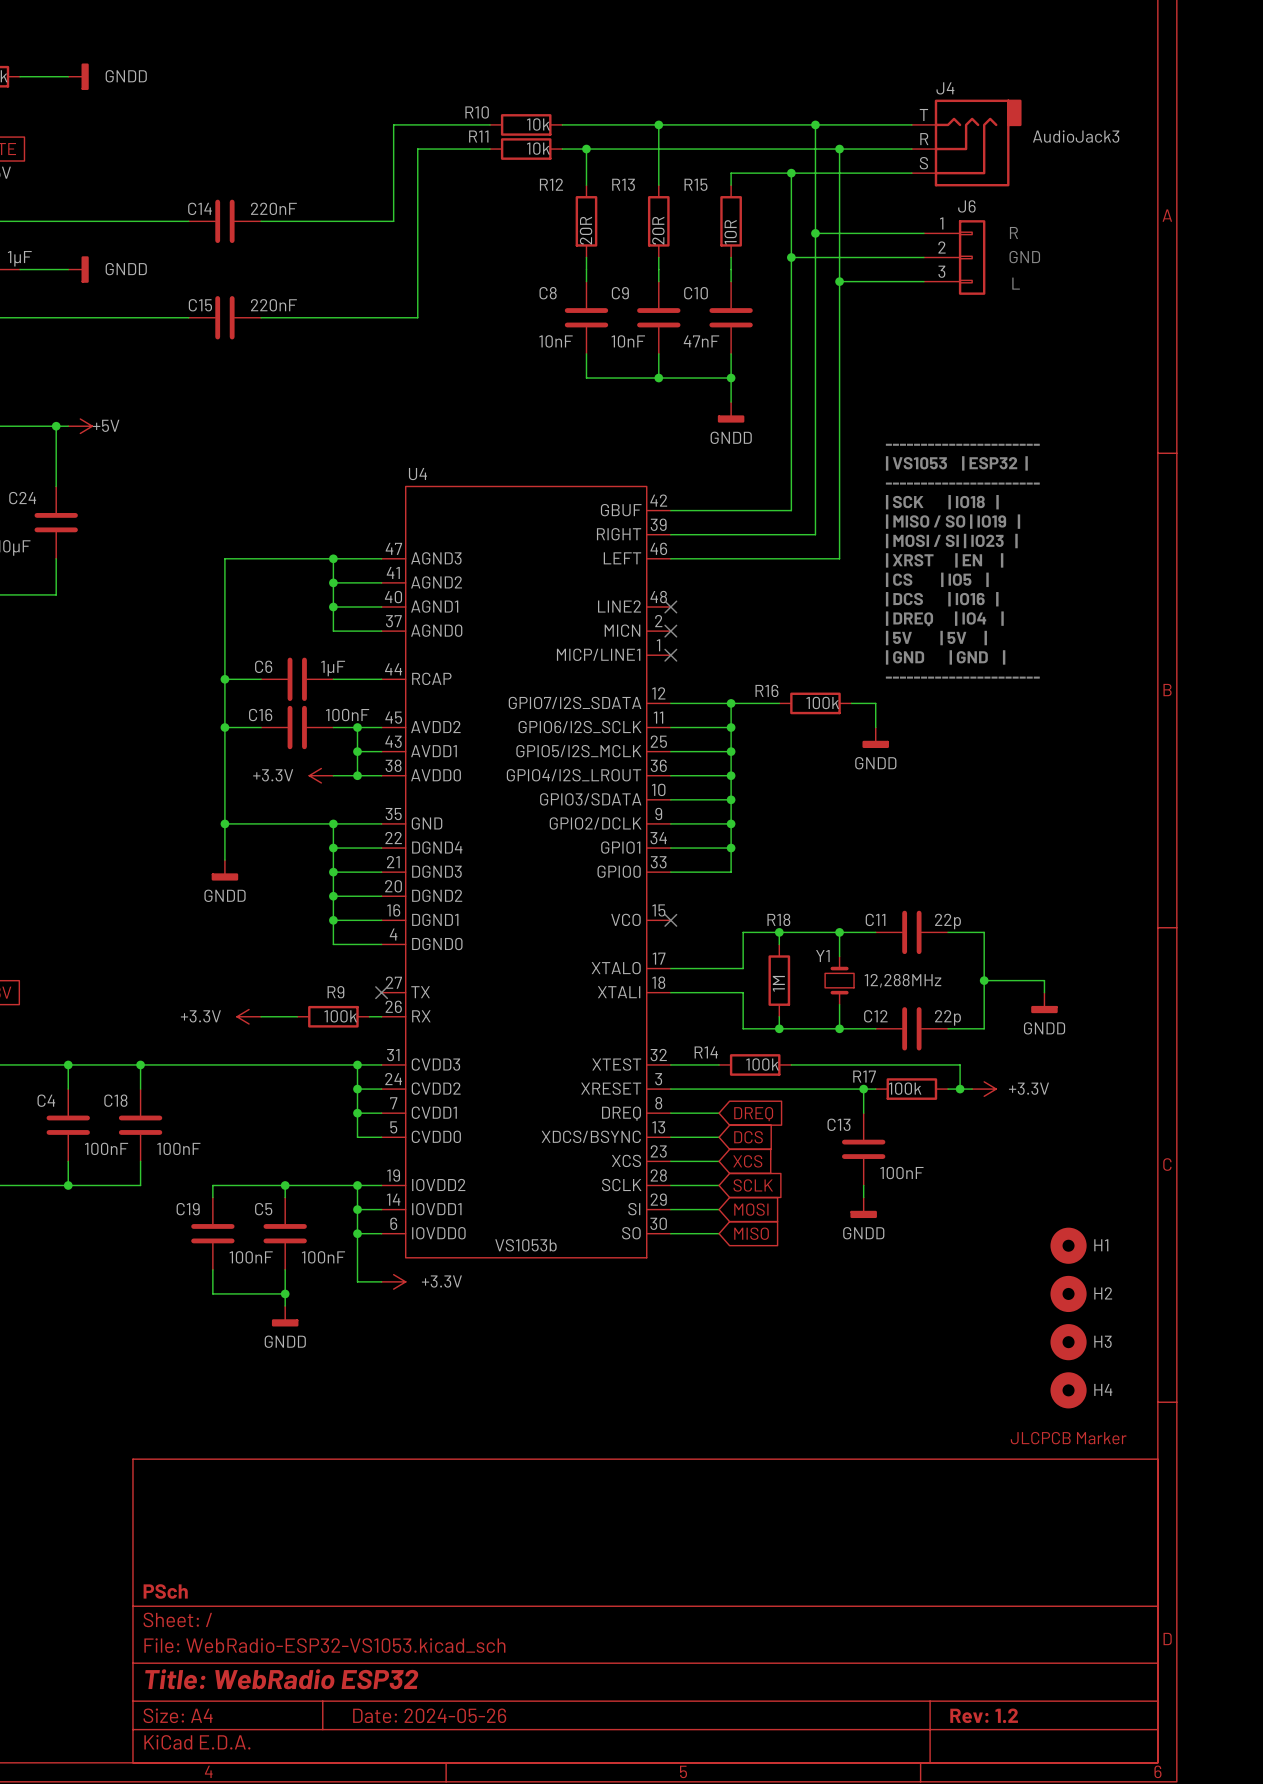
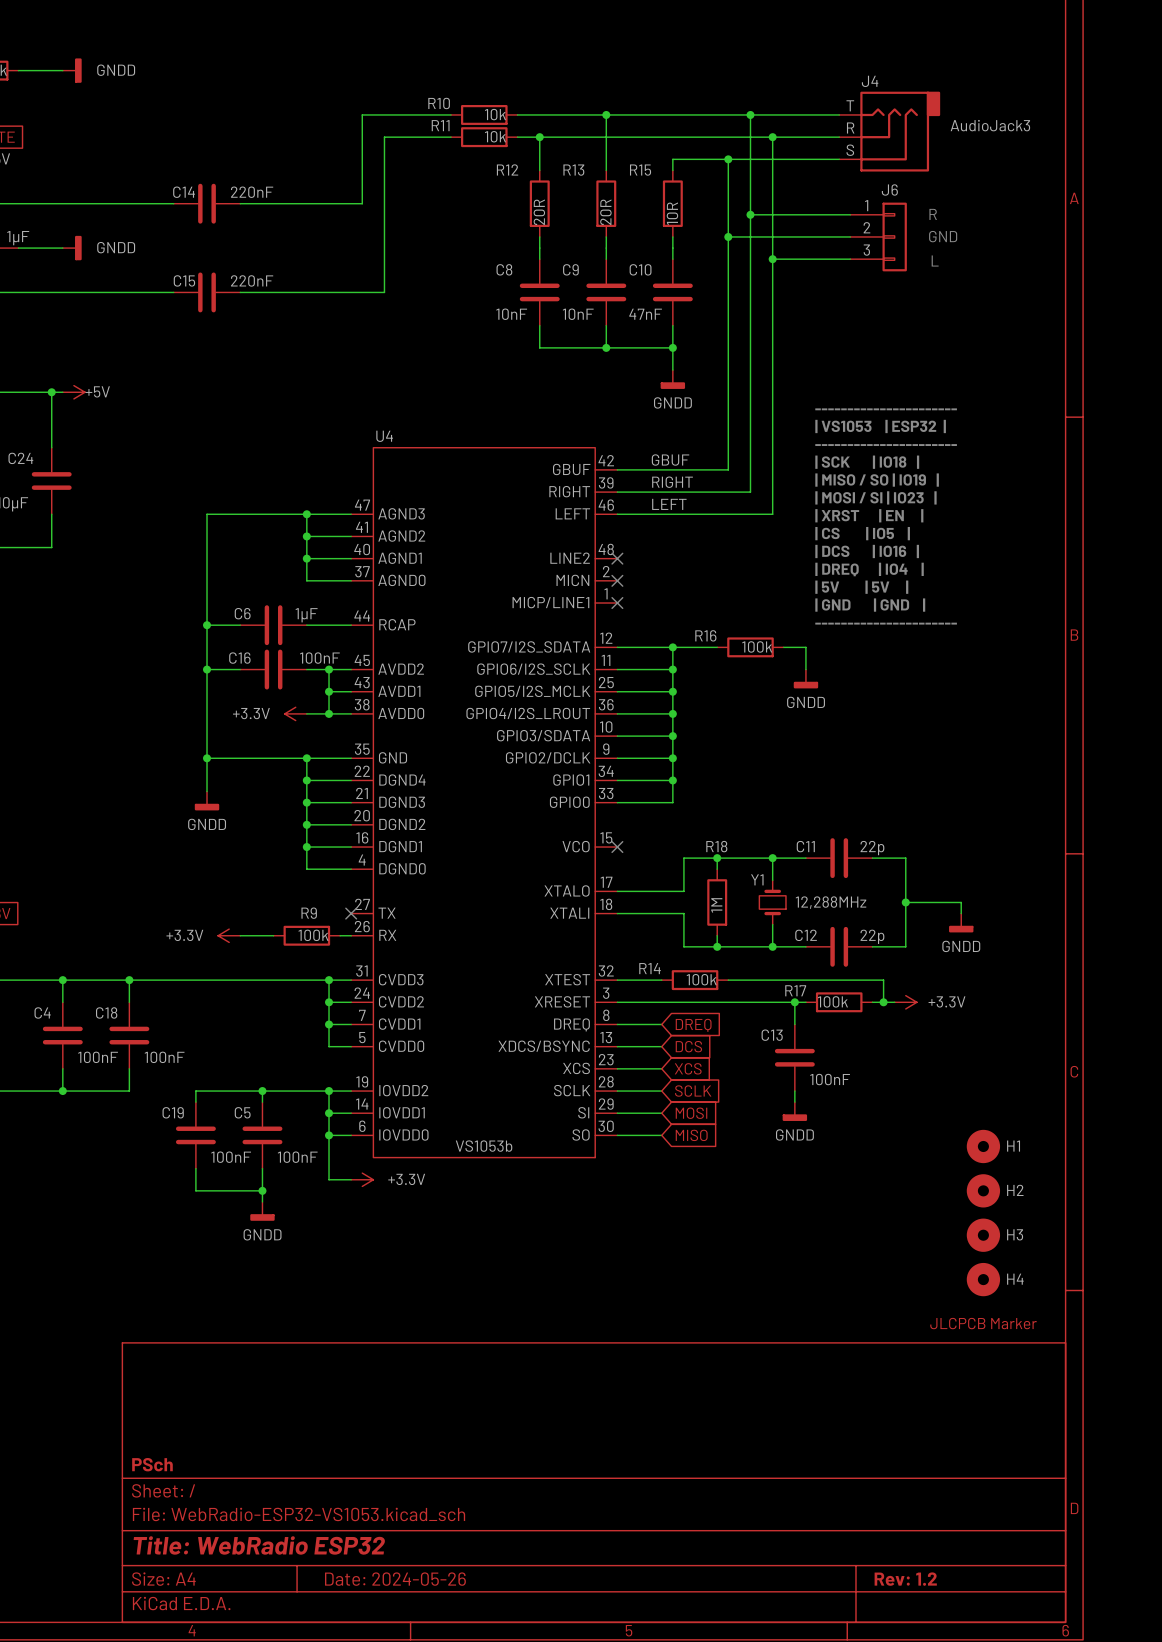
label: none -> GBUF (670, 460)
label: none -> RIGHT (672, 482)
label: none -> LEFT (669, 504)

